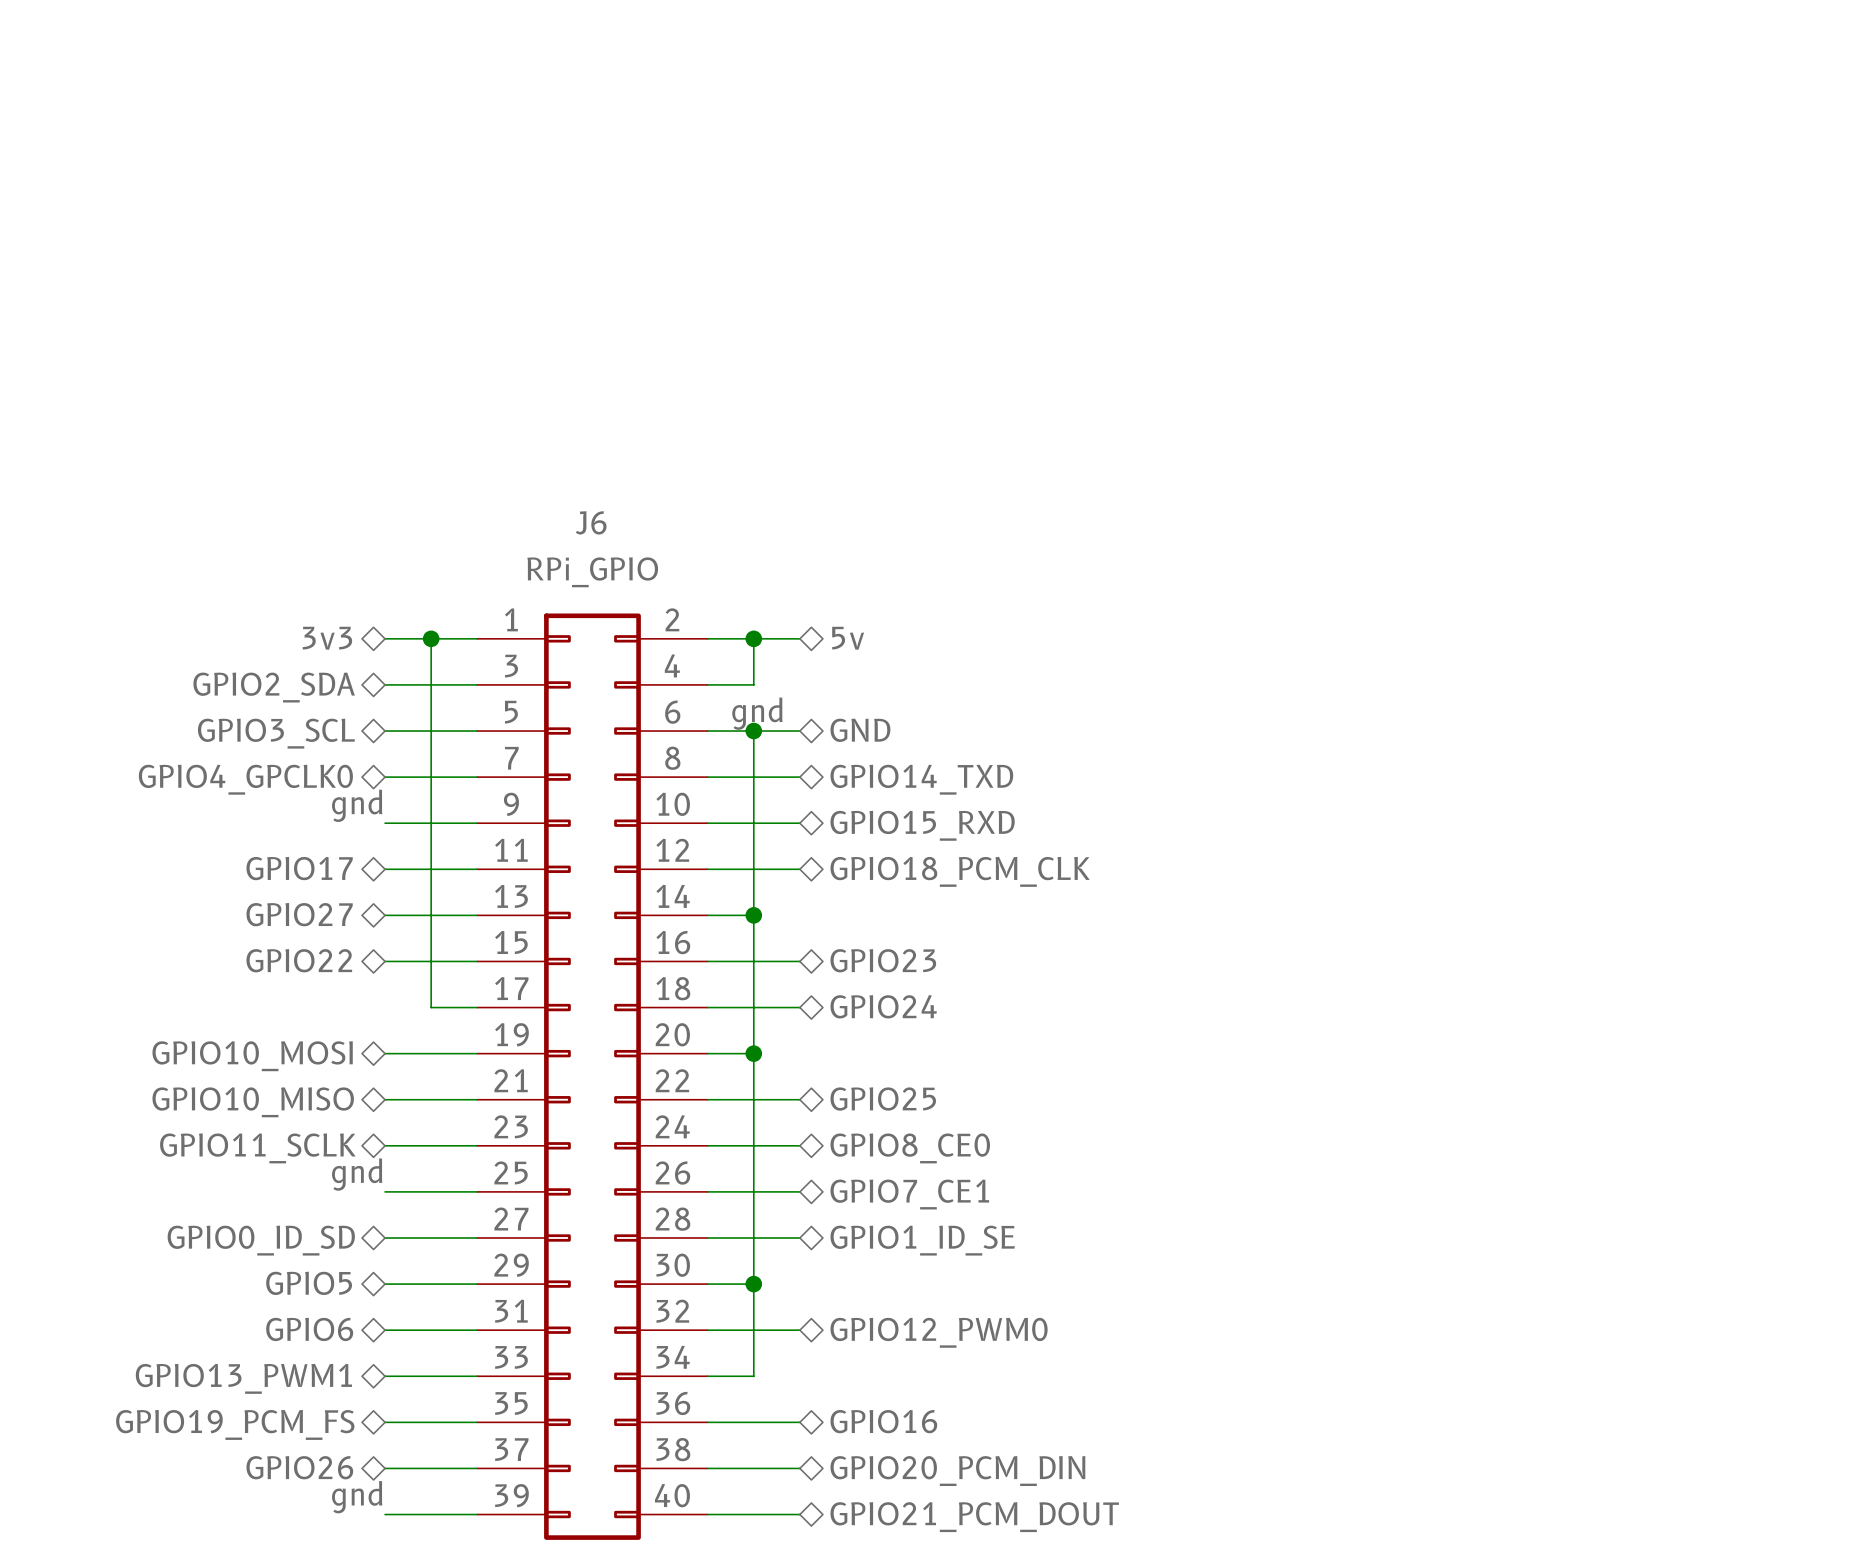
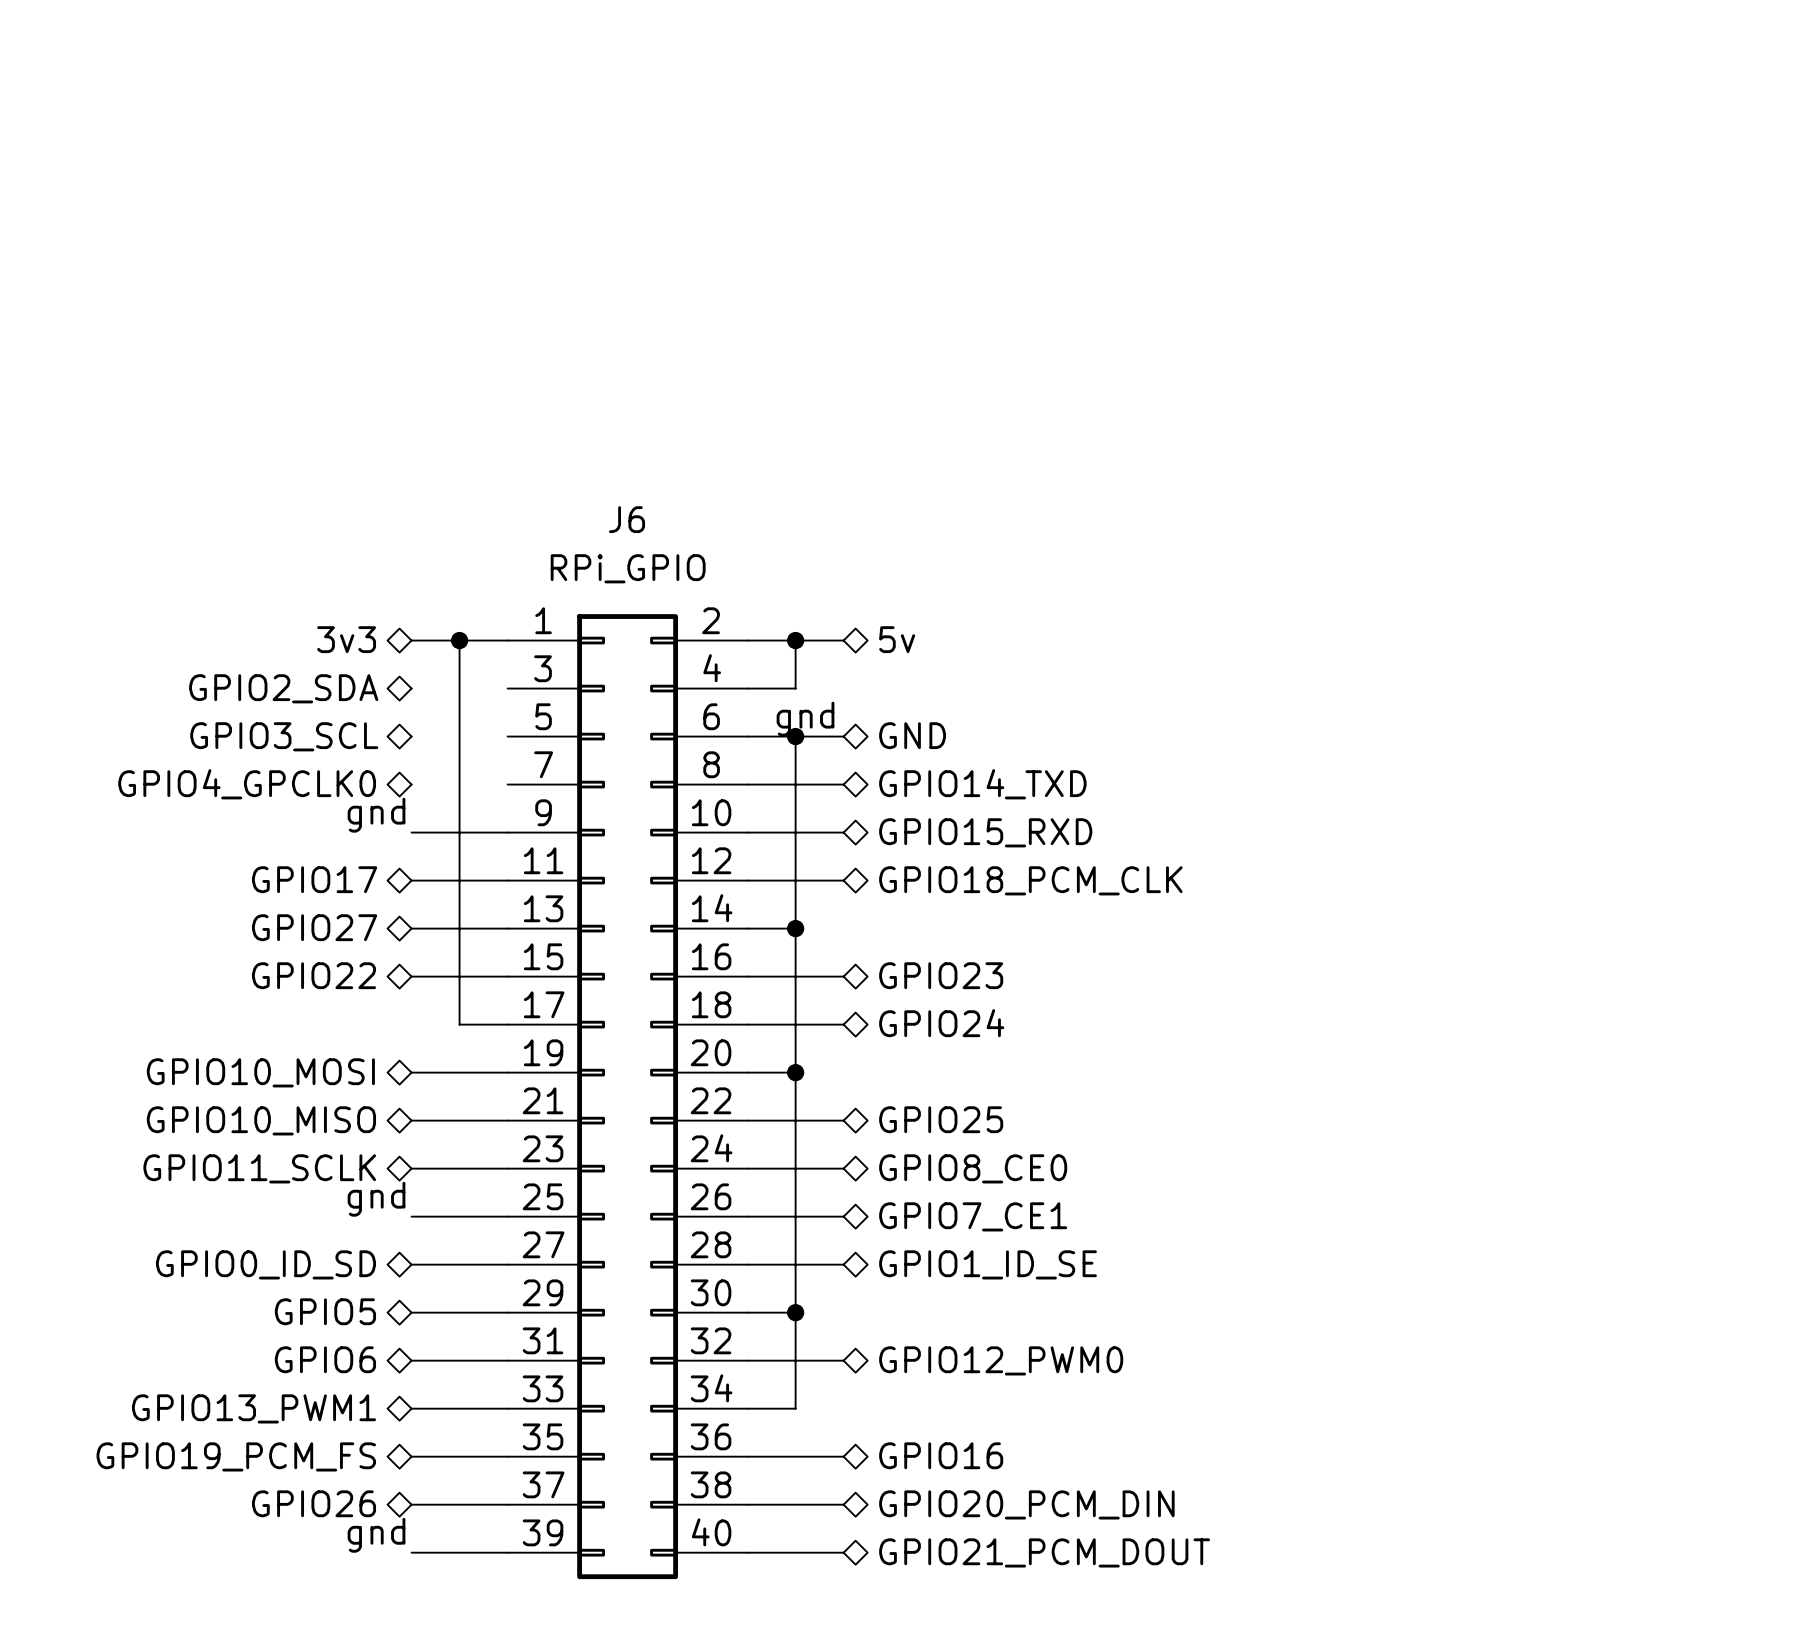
wire: (385, 684) (477, 684) -> none
wire: (385, 731) (477, 731) -> none
wire: (385, 777) (477, 777) -> none

